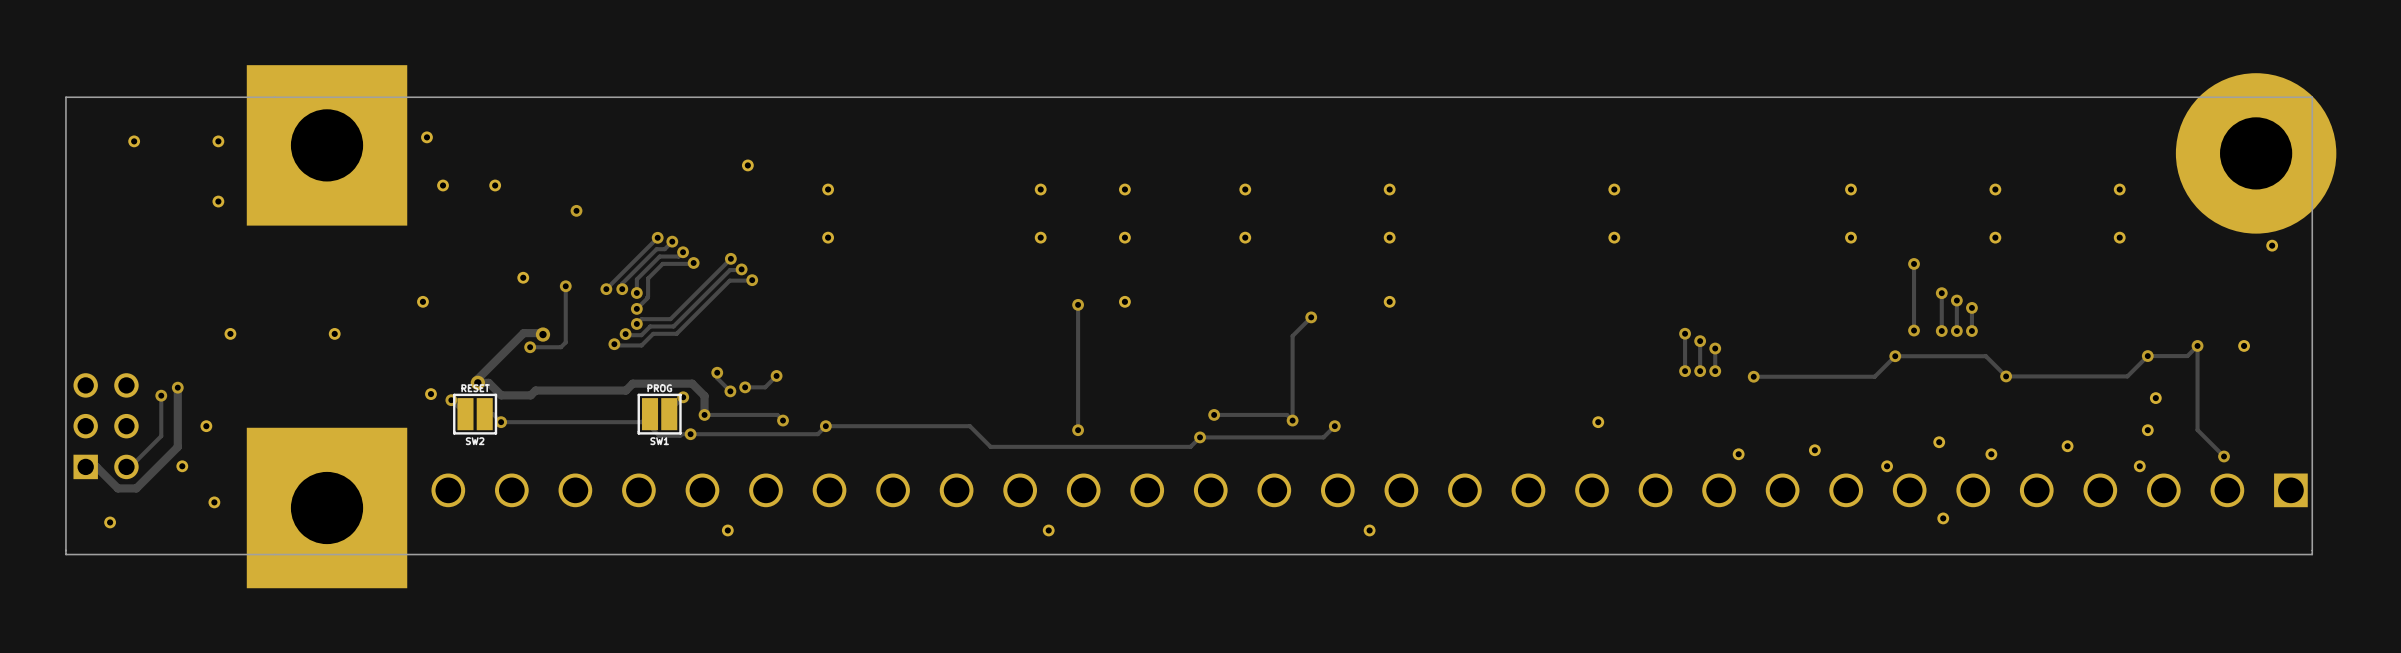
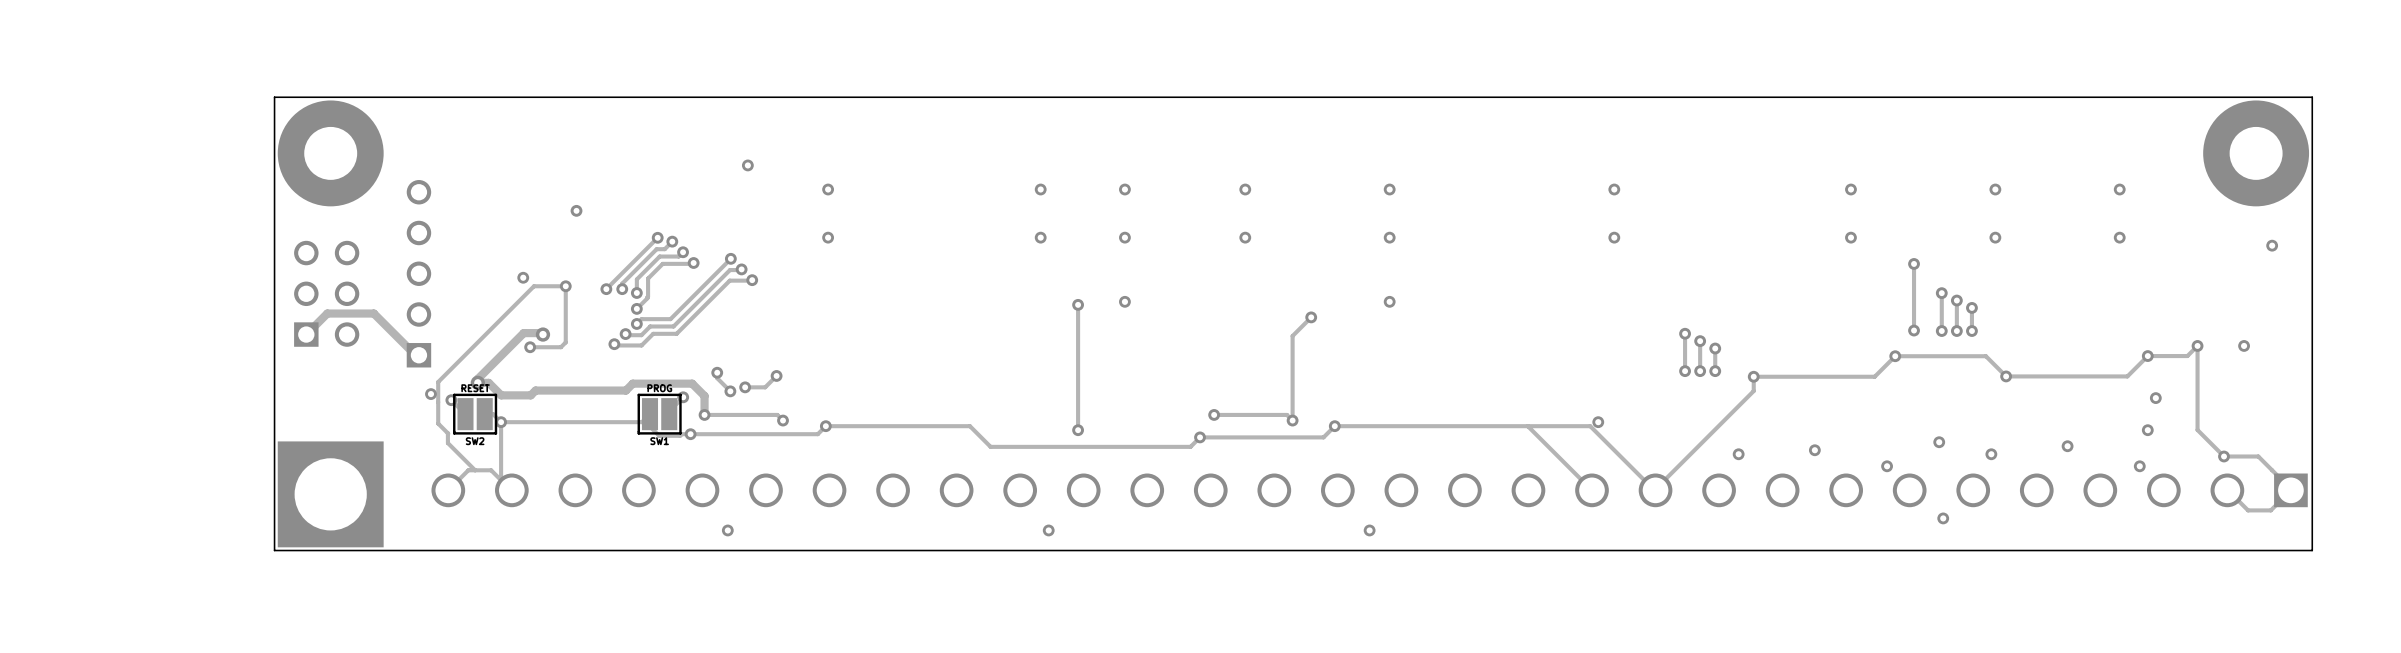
part footprint: [246, 65, 408, 226] -> [277, 100, 384, 207]
part footprint: [2175, 73, 2337, 234] -> [2203, 100, 2310, 207]
board edge: (274, 97) (65, 97) (65, 554) (2312, 554) (2312, 550) -> (274, 97) (274, 550) (2312, 550)
part: (426, 137) -> none
part: (134, 141) -> none
part: (218, 141) -> none
part: (443, 185) -> none
part: (495, 185) -> none
part: (218, 201) -> none
part: none -> (418, 273)
track: none -> (565, 286) (533, 286) (438, 382) (438, 423) (448, 433)
part: (422, 301) -> none
part: (230, 333) -> none
part: (334, 333) -> none
track: none -> (306, 334) (327, 313) (373, 313) (415, 355) (418, 355)
track: none -> (1753, 376) (1753, 391) (1655, 490) (1590, 426) (1334, 426)
track: (177, 387) (177, 447) (136, 488) (117, 488) (96, 466) (85, 466) -> none
via: (177, 387) -> none
track: (161, 395) (161, 436) (130, 466) (126, 466) -> none
via: (161, 395) -> none
track: none -> (501, 422) (501, 479) (511, 490) (491, 470) (468, 470) (448, 490)
part position: (106, 426) -> (326, 293)
part: (206, 426) -> none
track: none -> (1527, 426) (1592, 490)
part footprint: [246, 427, 408, 589] -> [277, 441, 384, 548]
track: none -> (447, 433) (447, 443) (475, 470)
track: none -> (2224, 456) (2258, 456) (2290, 489) (2270, 510) (2248, 510) (2227, 490)
part: (182, 466) -> none
part: (214, 502) -> none
part: (110, 522) -> none

